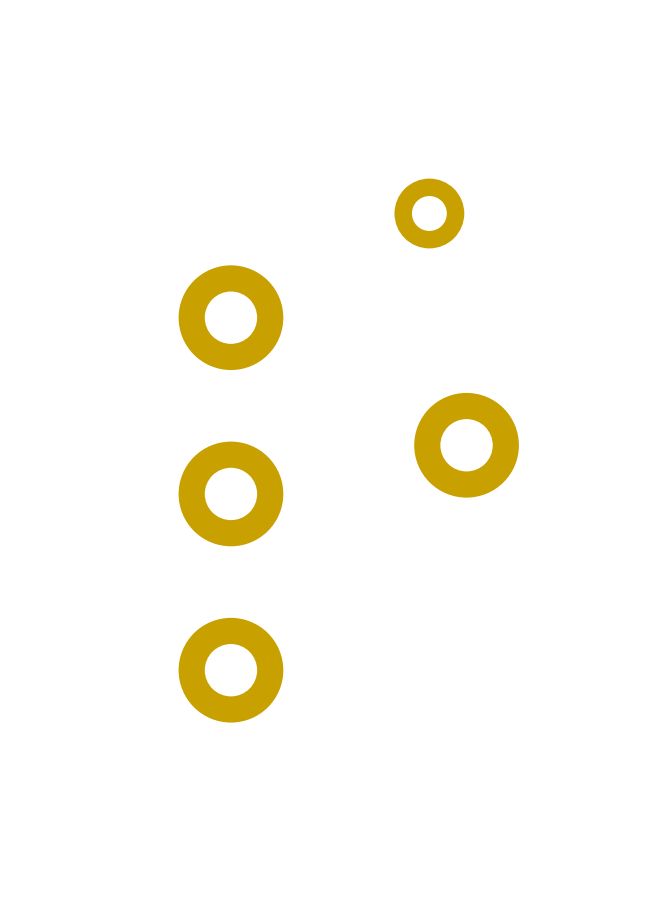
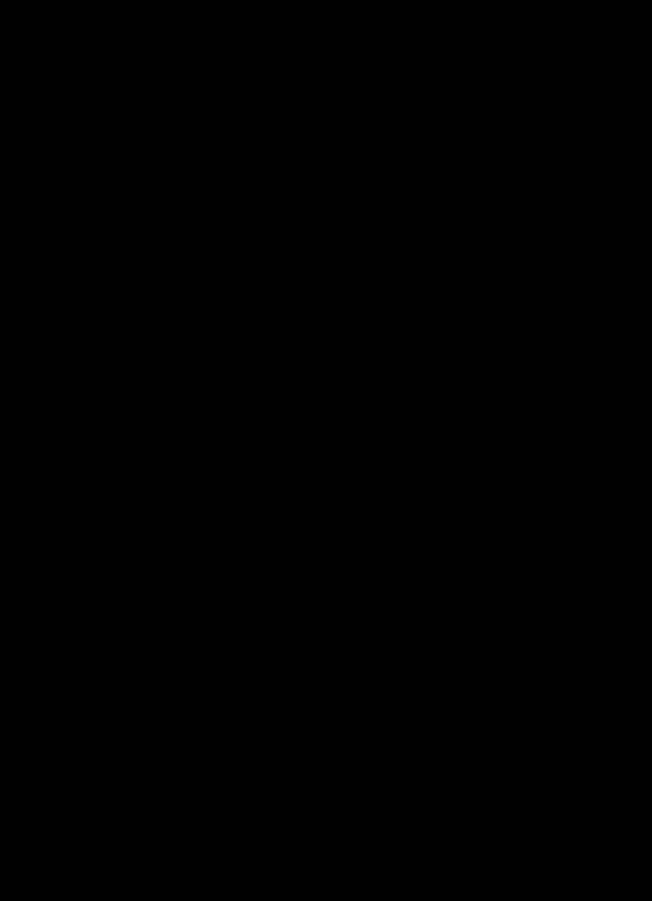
part: (429, 213) -> none
part: (230, 317) -> none
part: (466, 445) -> none
part: (230, 493) -> none
part: (230, 670) -> none

